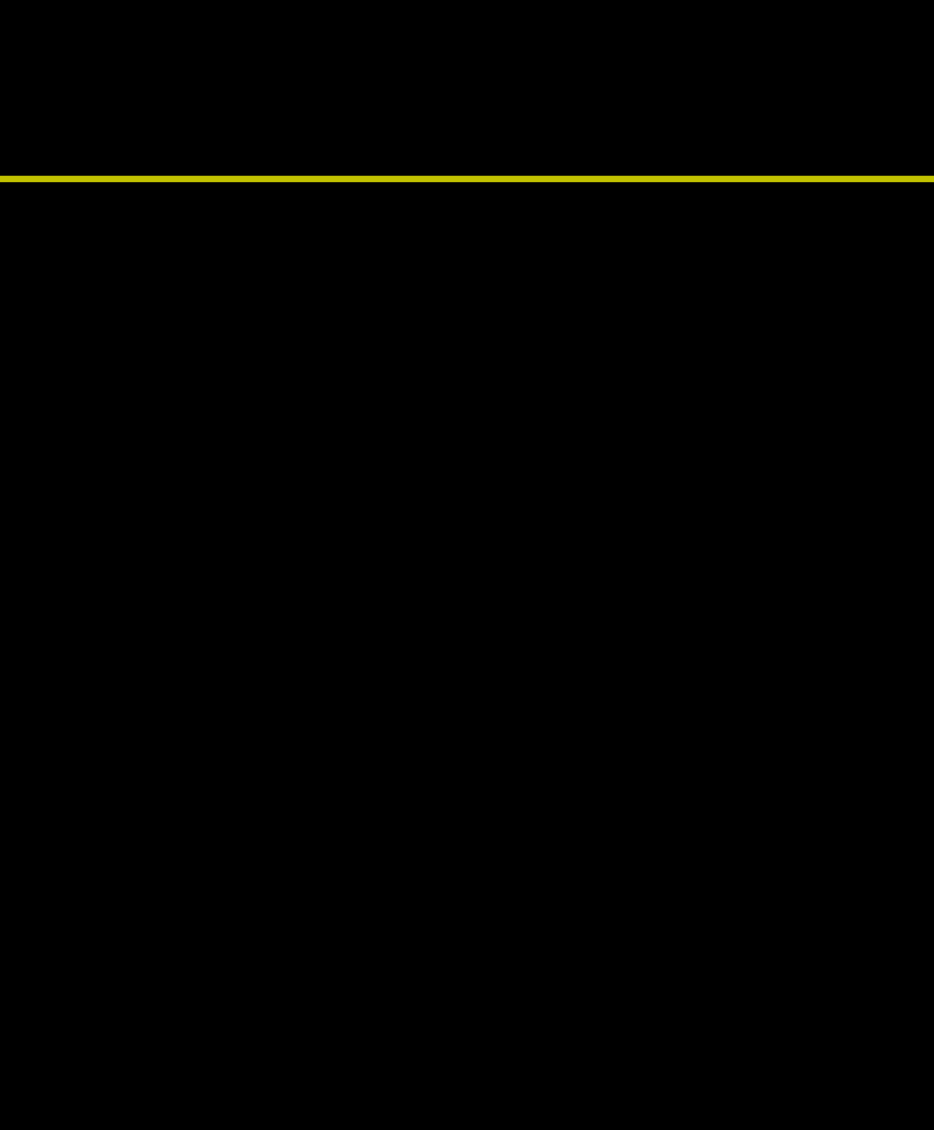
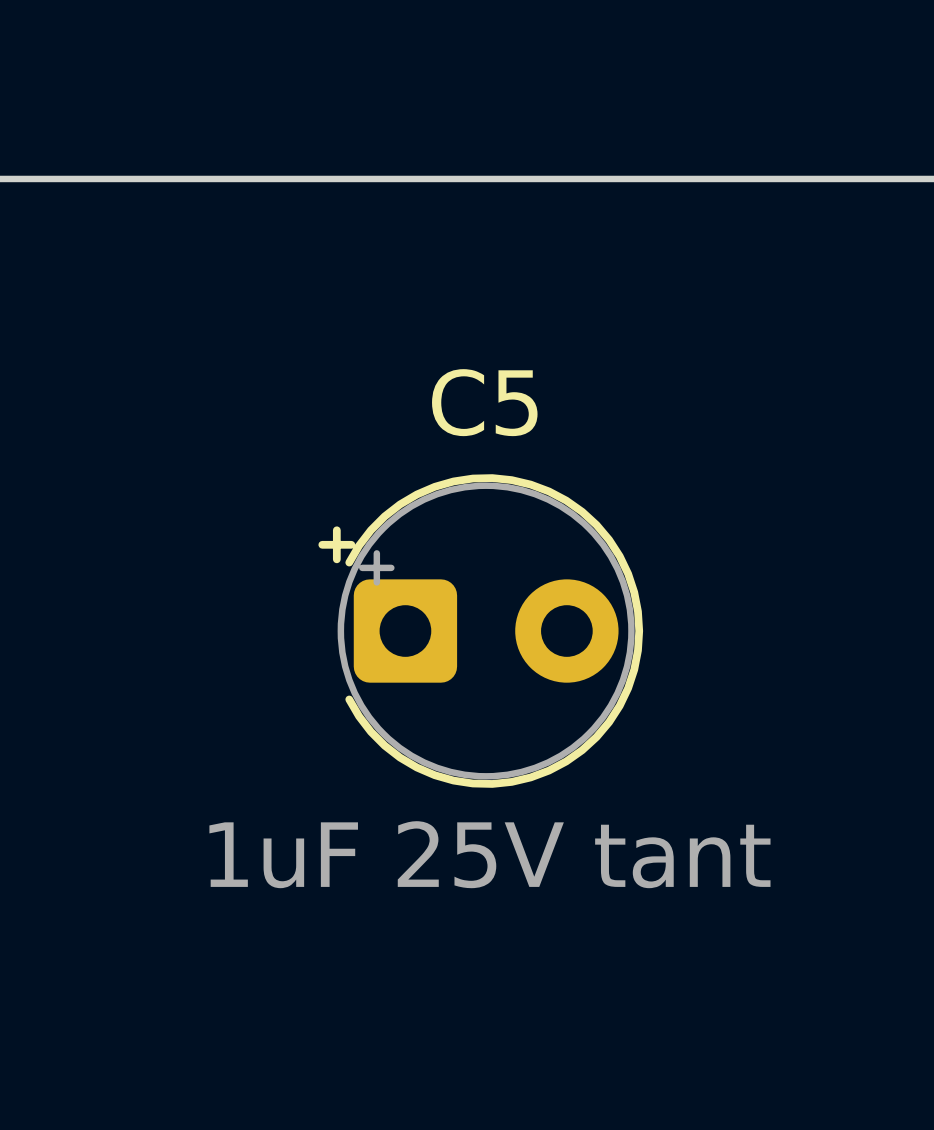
C5: none -> 1uF 25V tant (480, 631)

